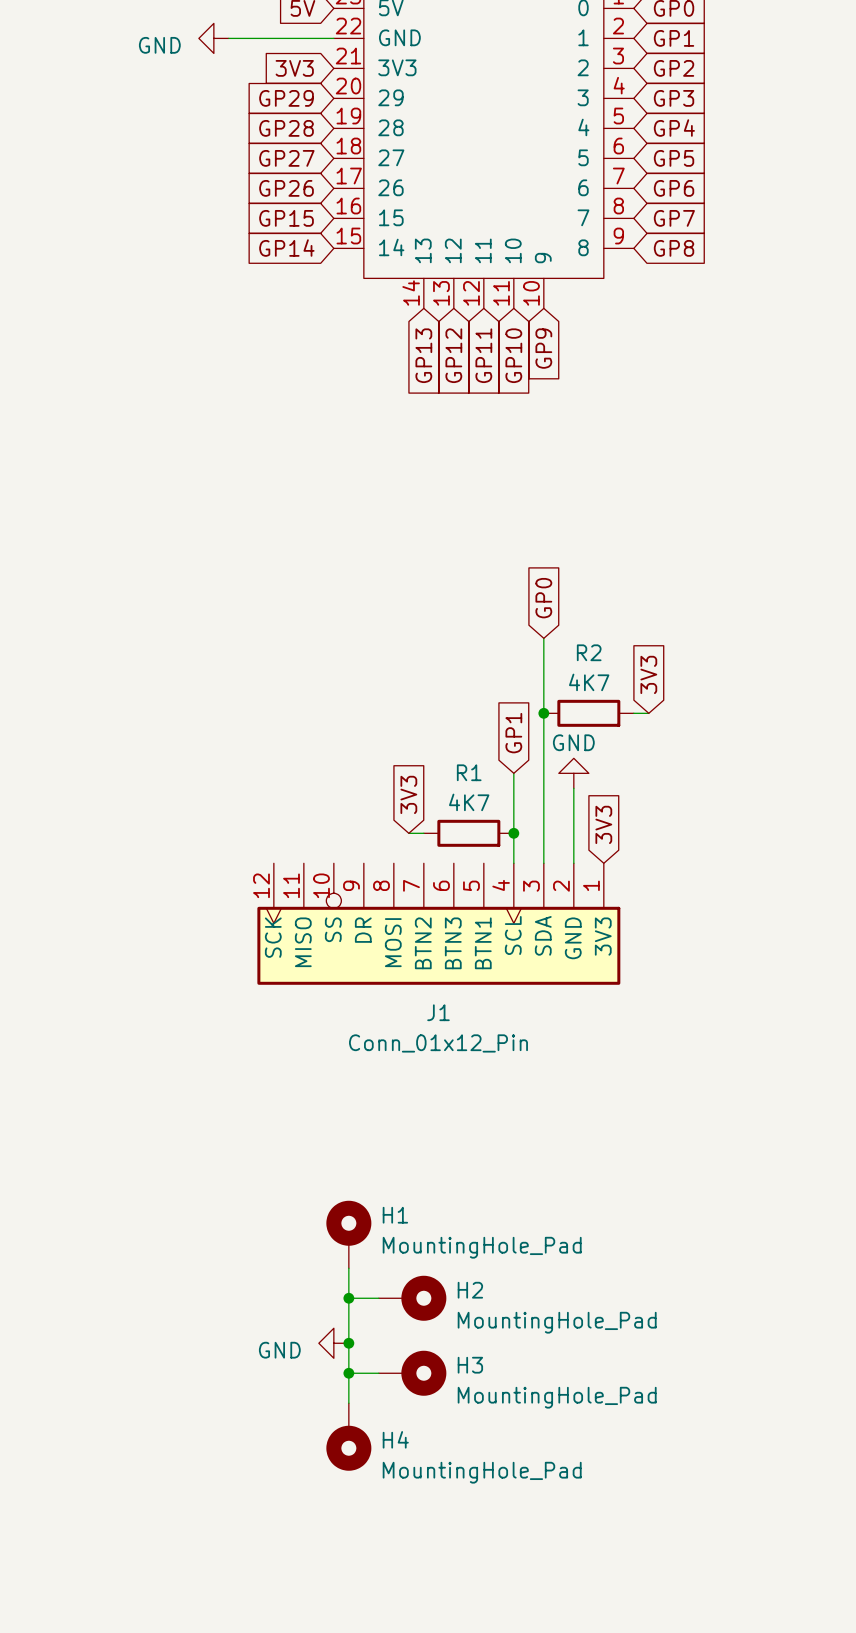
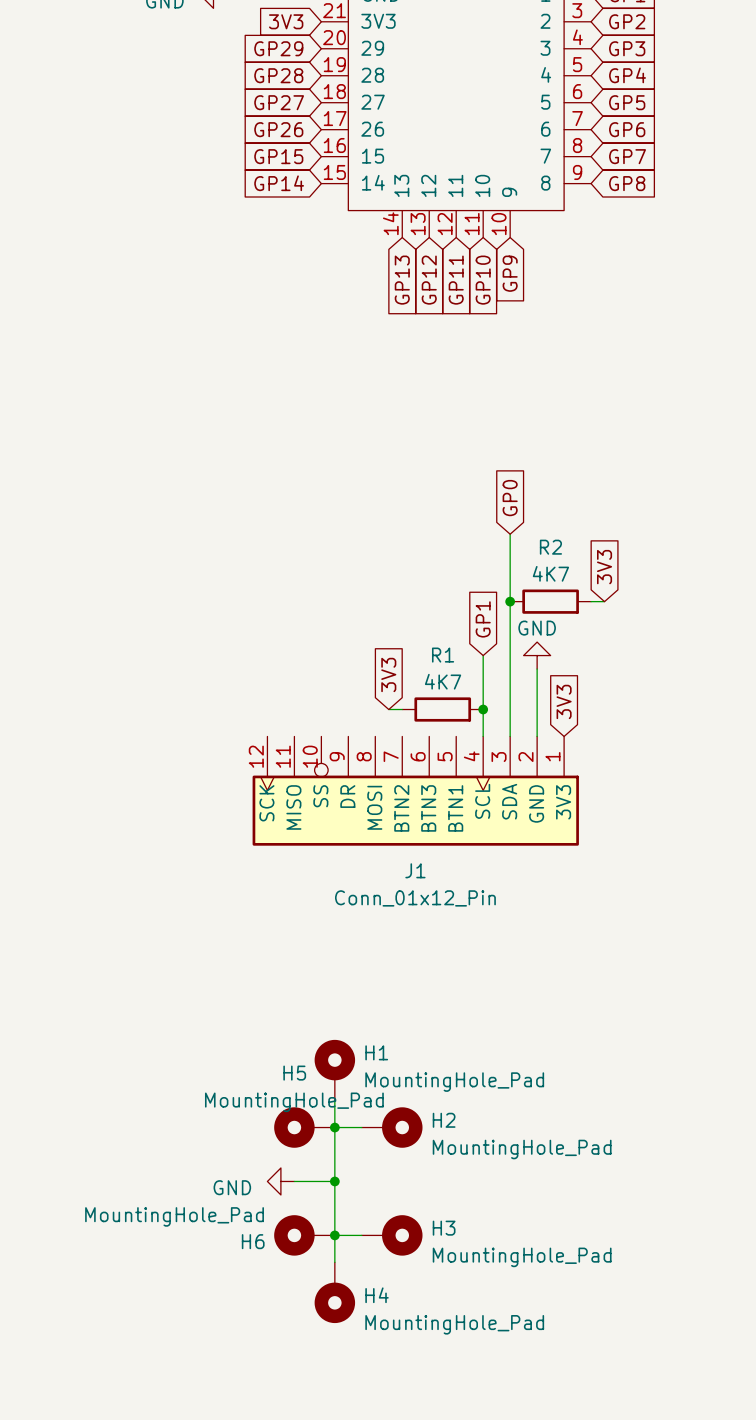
H5: none -> MountingHole_Pad (304, 1127)
power symbol position: GND (333, 1343) -> GND (280, 1181)
junction: (348, 1343) -> none
wire: none -> (294, 1181) (334, 1181)
junction: none -> (334, 1181)
wire: (348, 1373) (378, 1373) -> (334, 1235) (361, 1235)
junction: (348, 1373) -> none
H3 position: (412, 1373) -> (392, 1235)
H6: none -> MountingHole_Pad (304, 1235)
junction: none -> (334, 1235)
H4 position: (348, 1437) -> (334, 1292)

